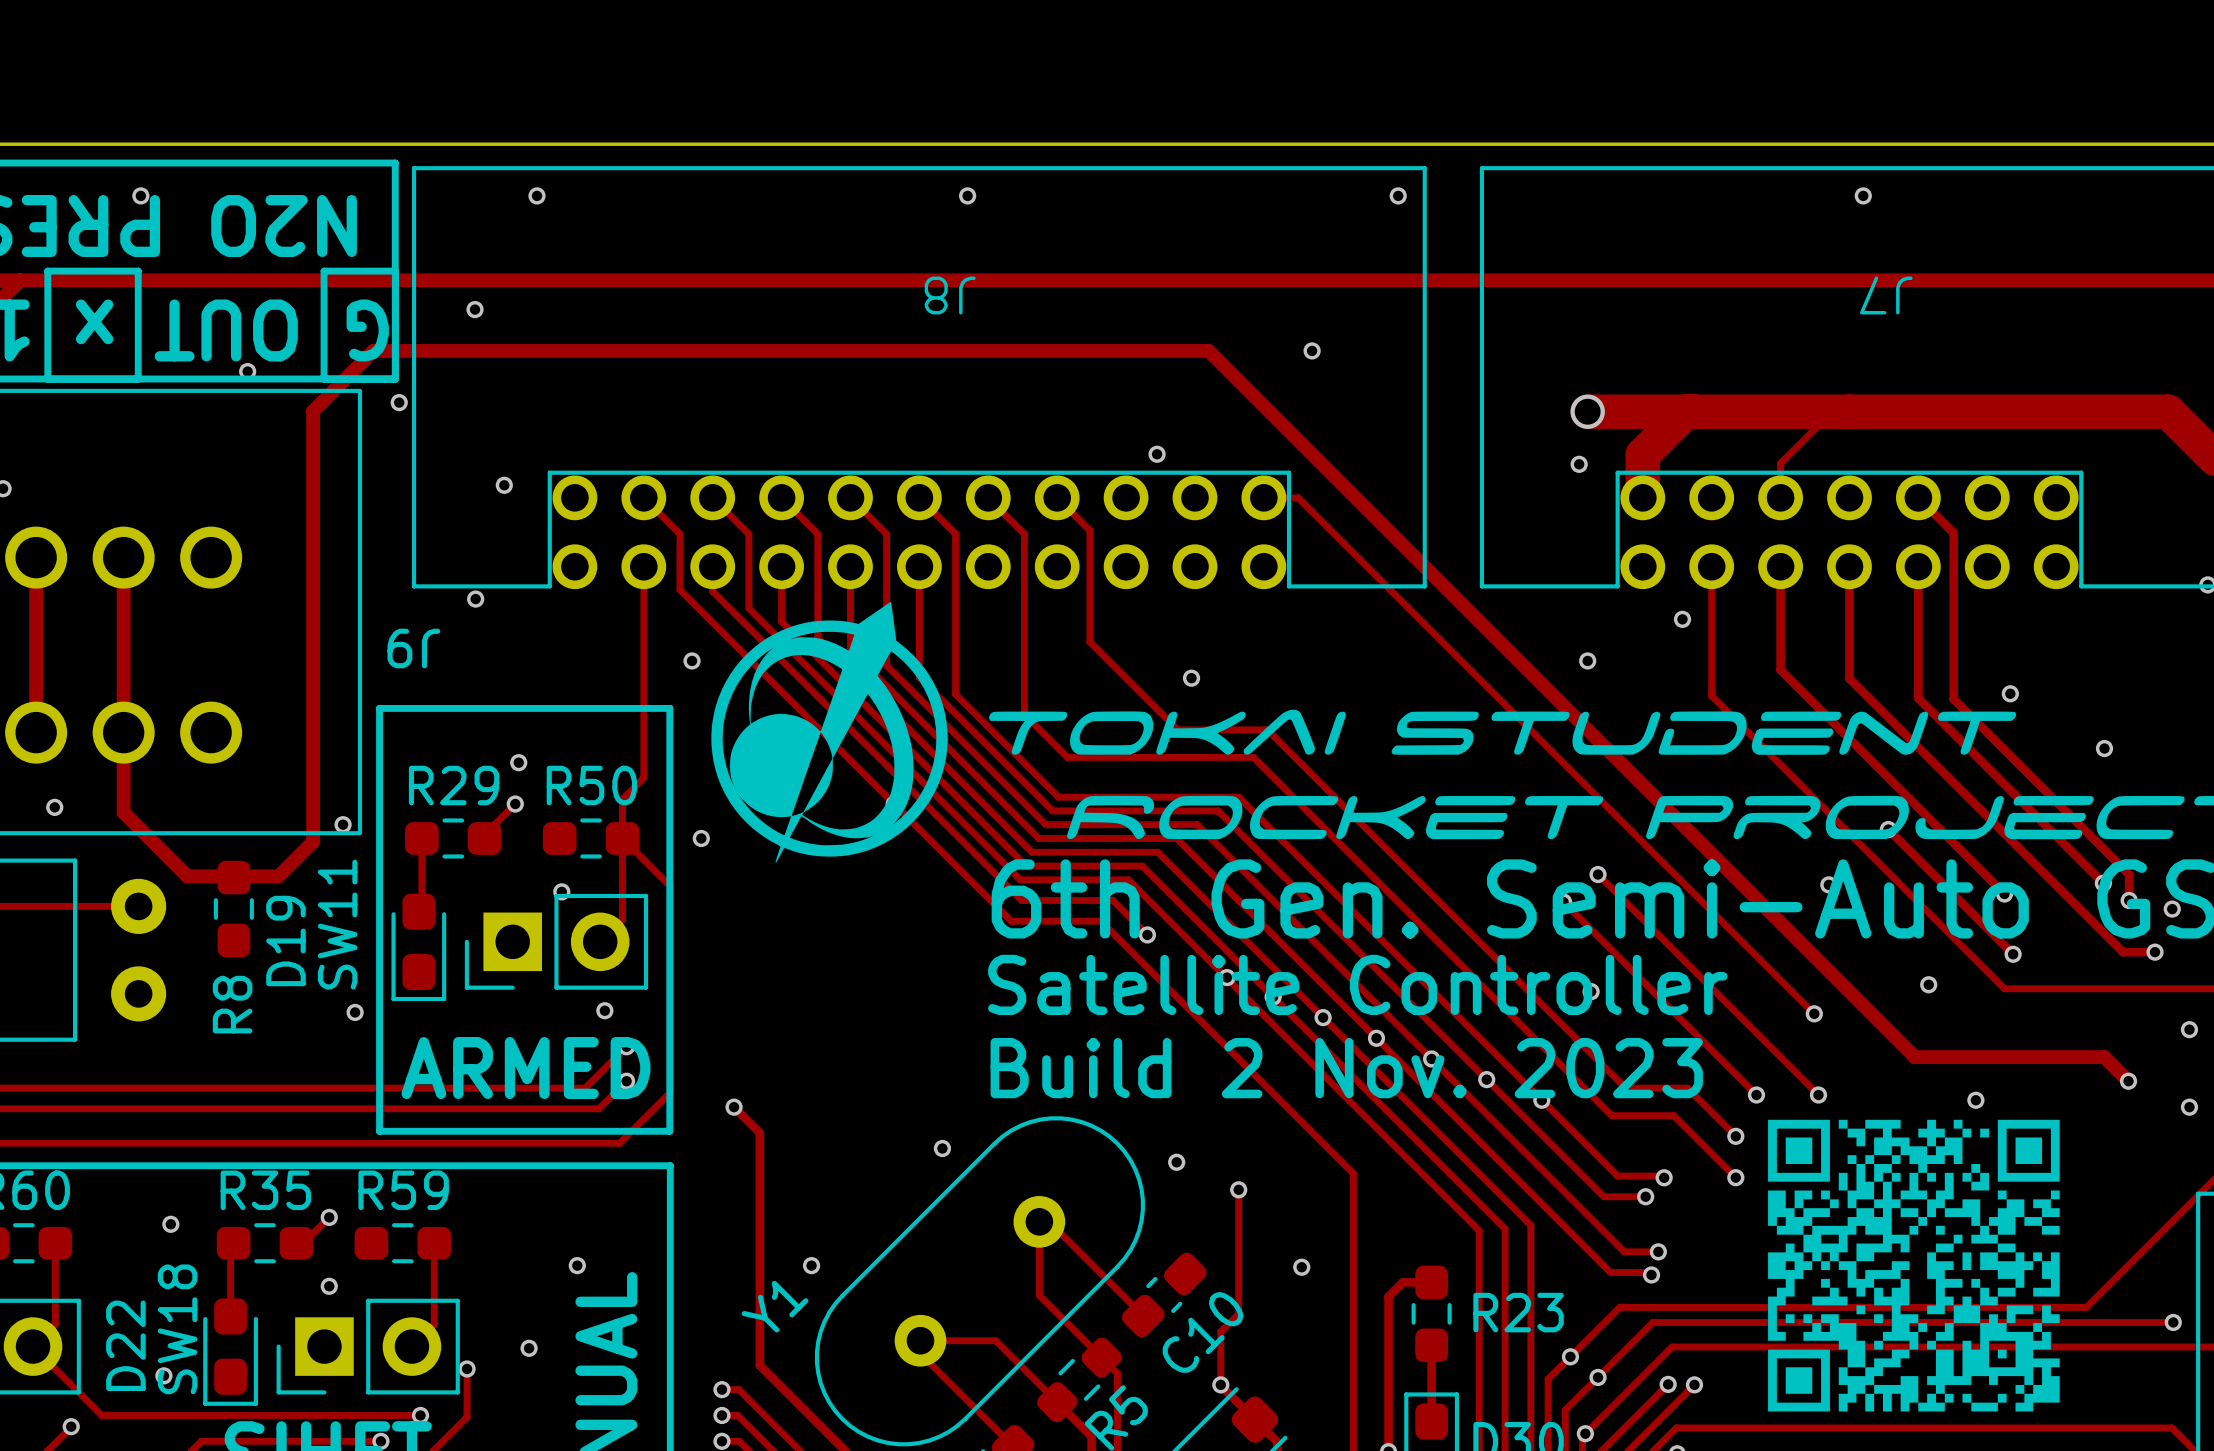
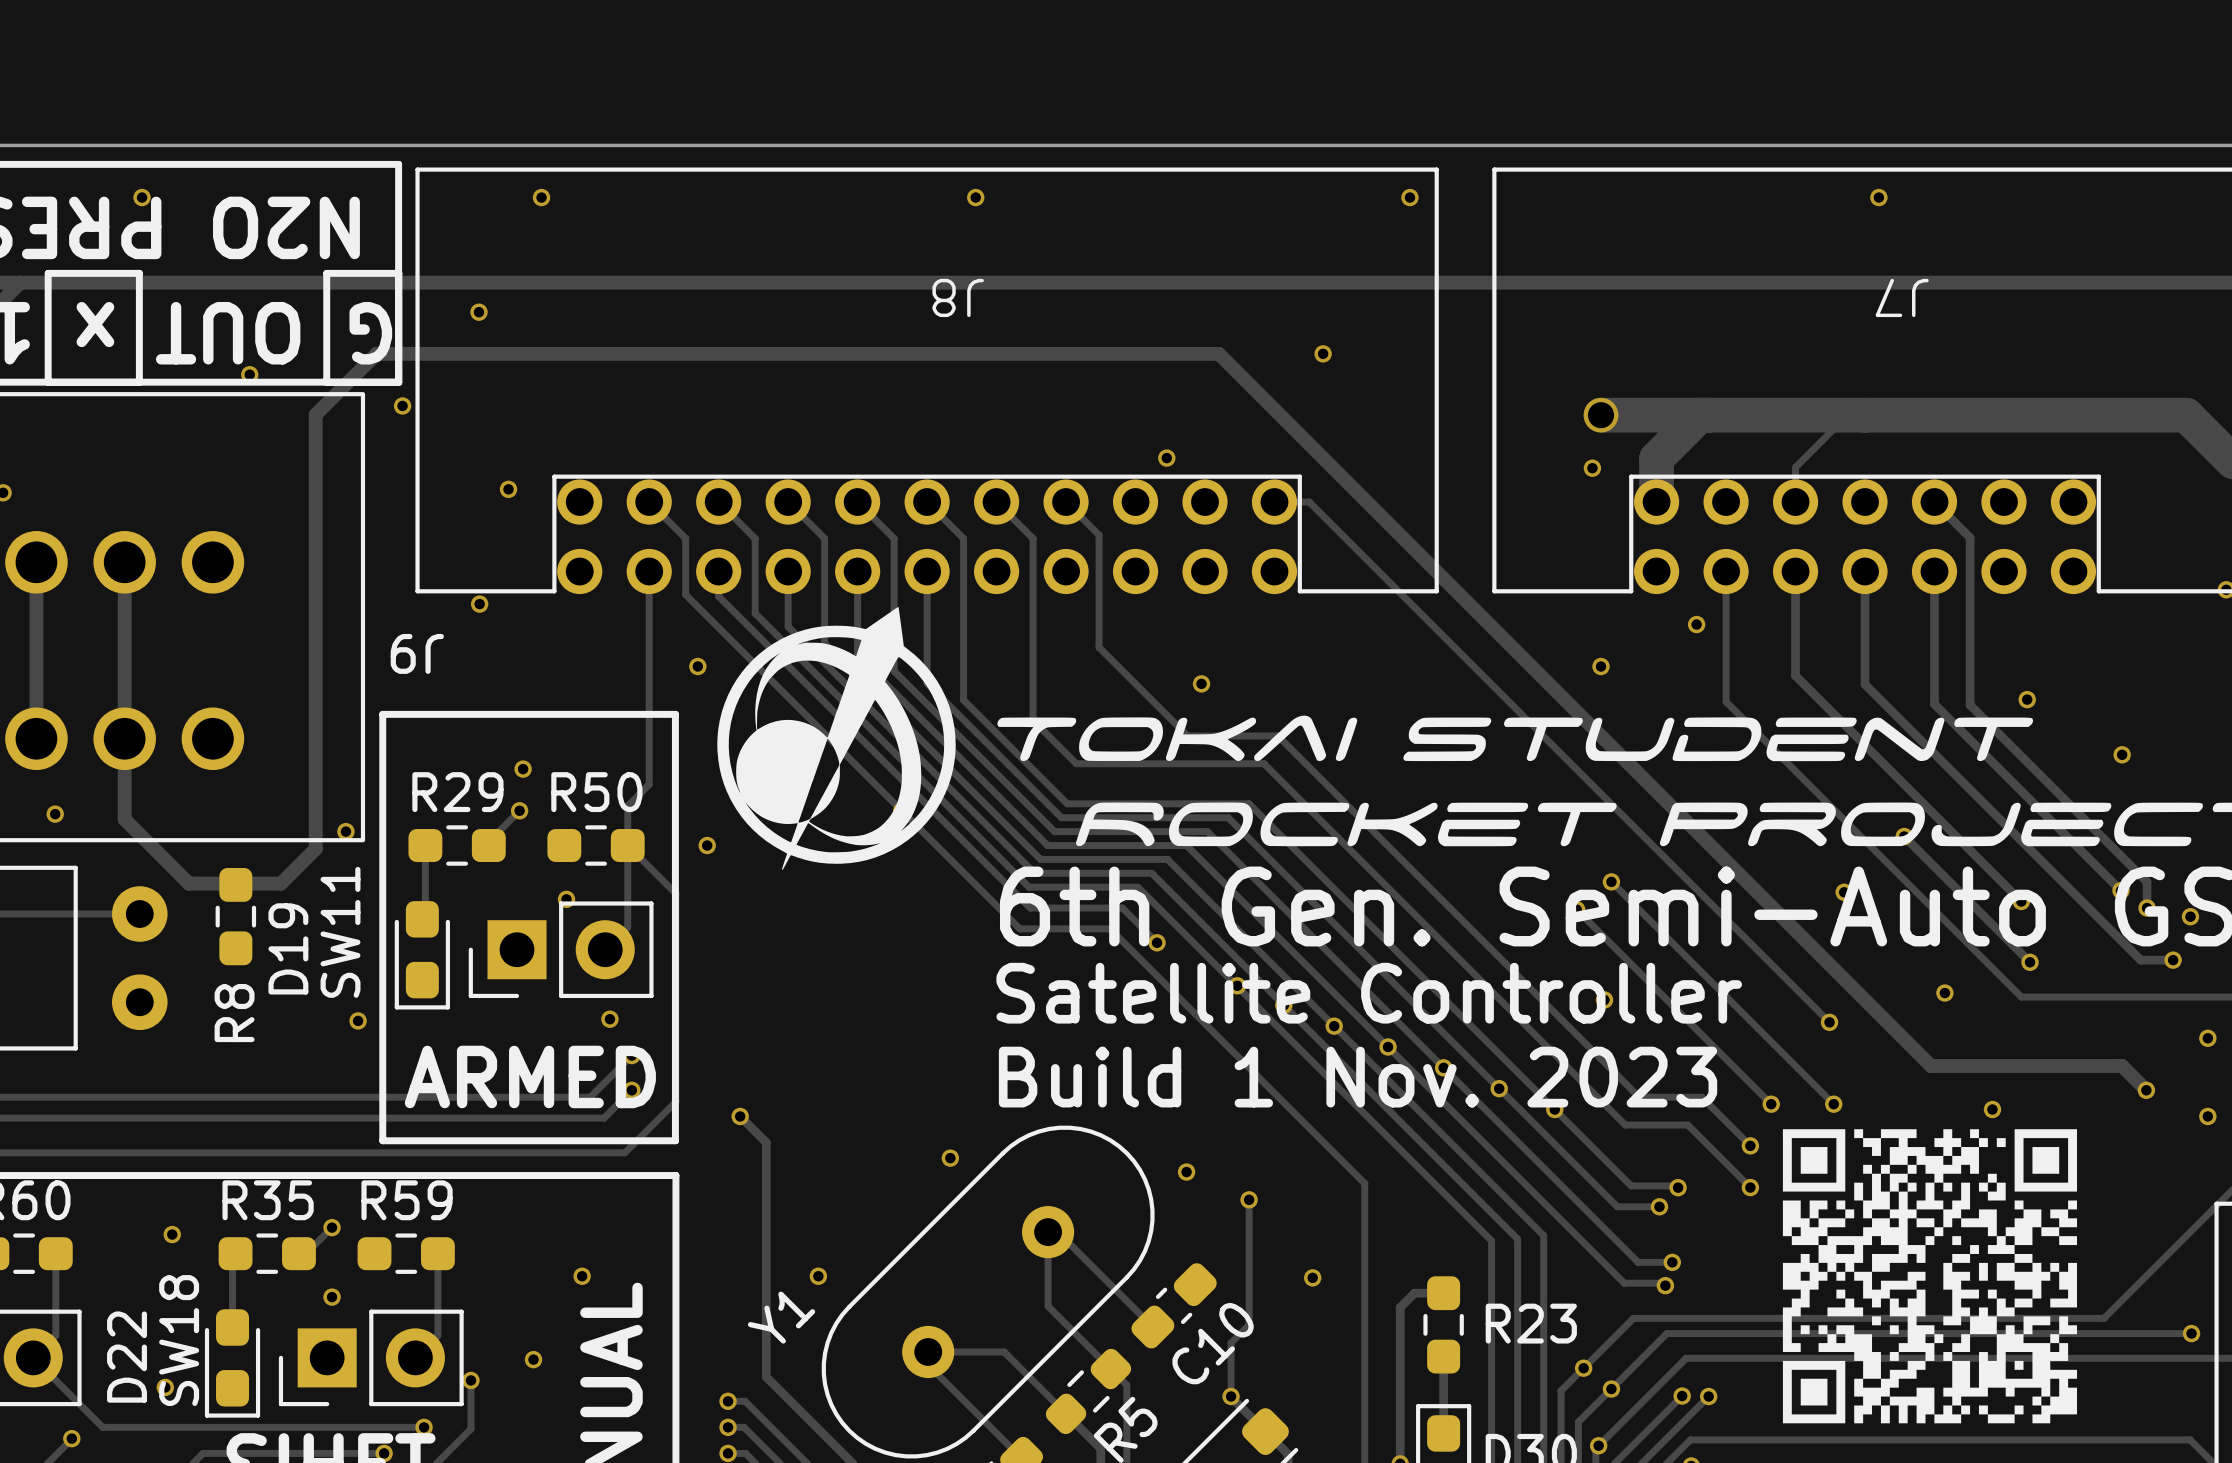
text: Build 2 Nov. 2023 (1346, 1068) -> Build 1 Nov. 2023 (1358, 1077)

